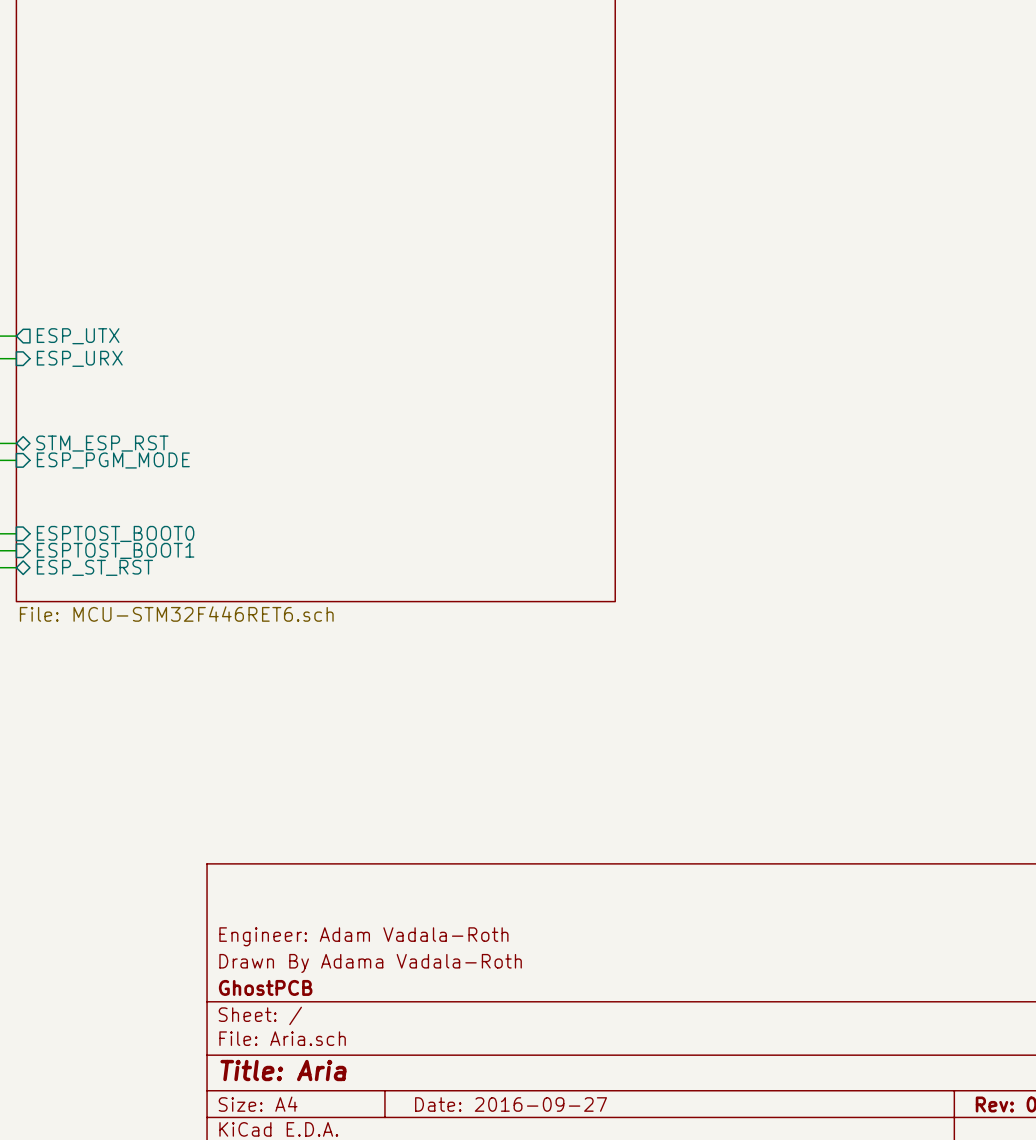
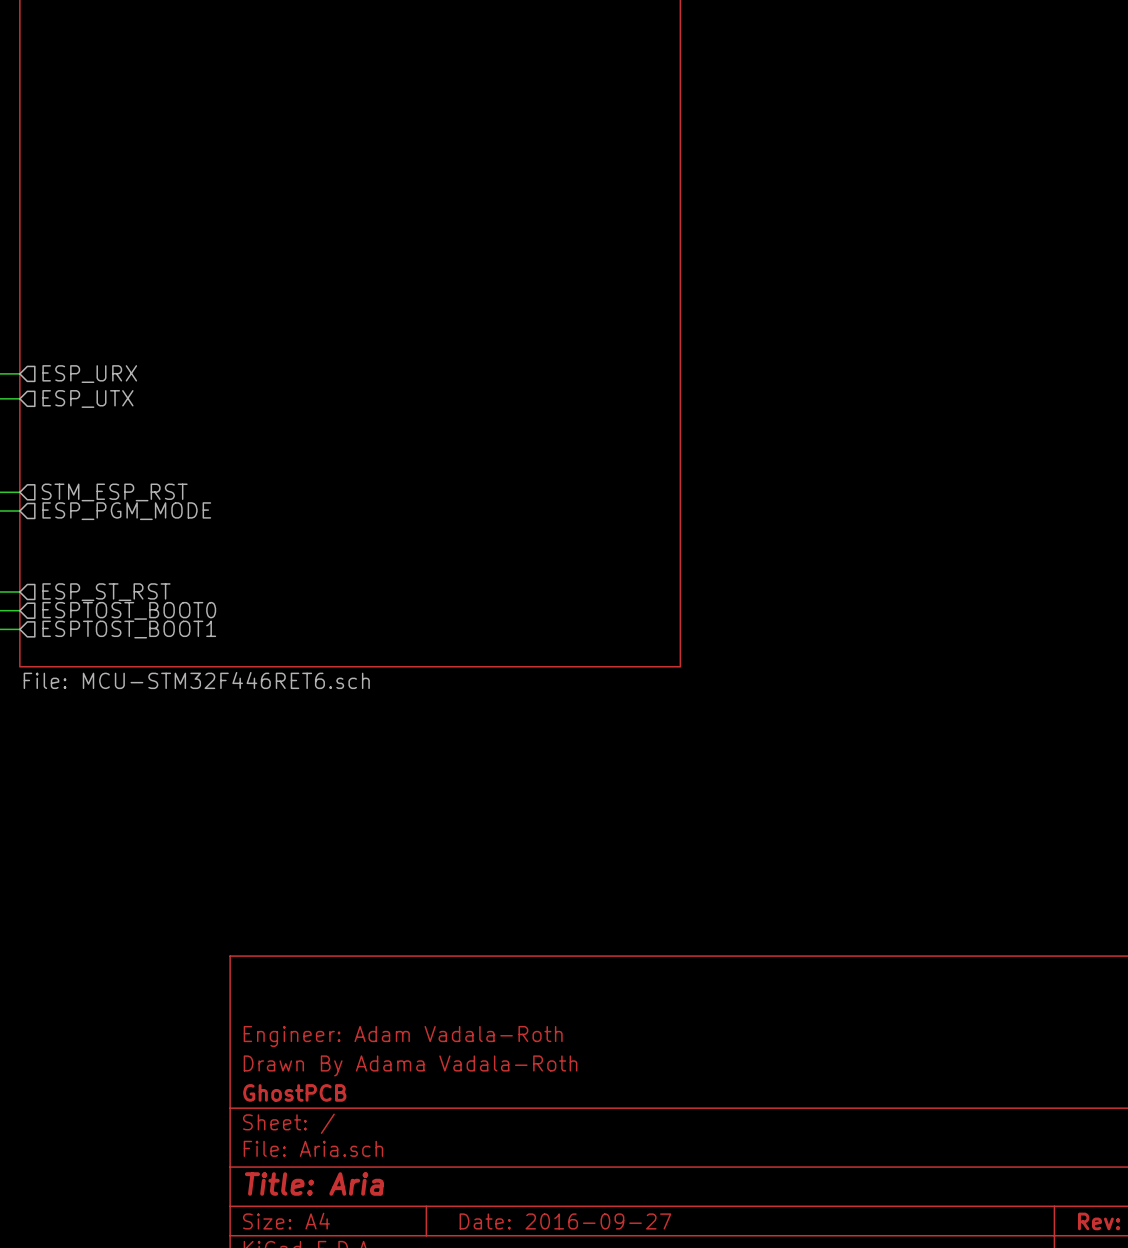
sheet pin: ESP_UTX (78, 336) -> none
hierarchical label: none -> ESP_URX (89, 374)
hierarchical label: none -> ESP_UTX (87, 398)
sheet pin: ESP_URX (79, 358) -> none
sheet pin: STM_ESP_RST (102, 443) -> none
hierarchical label: none -> STM_ESP_RST (114, 492)
sheet pin: ESP_PGM_MODE (113, 460) -> none
hierarchical label: none -> ESP_PGM_MODE (126, 511)
hierarchical label: none -> ESP_ST_RST (106, 592)
sheet pin: ESPTOST_BOOT0 (115, 533) -> none
sheet pin: ESPTOST_BOOT1 (115, 550) -> none
hierarchical label: none -> ESPTOST_BOOT0 (129, 610)
sheet pin: ESP_ST_RST (94, 567) -> none
hierarchical label: none -> ESPTOST_BOOT1 (129, 629)

